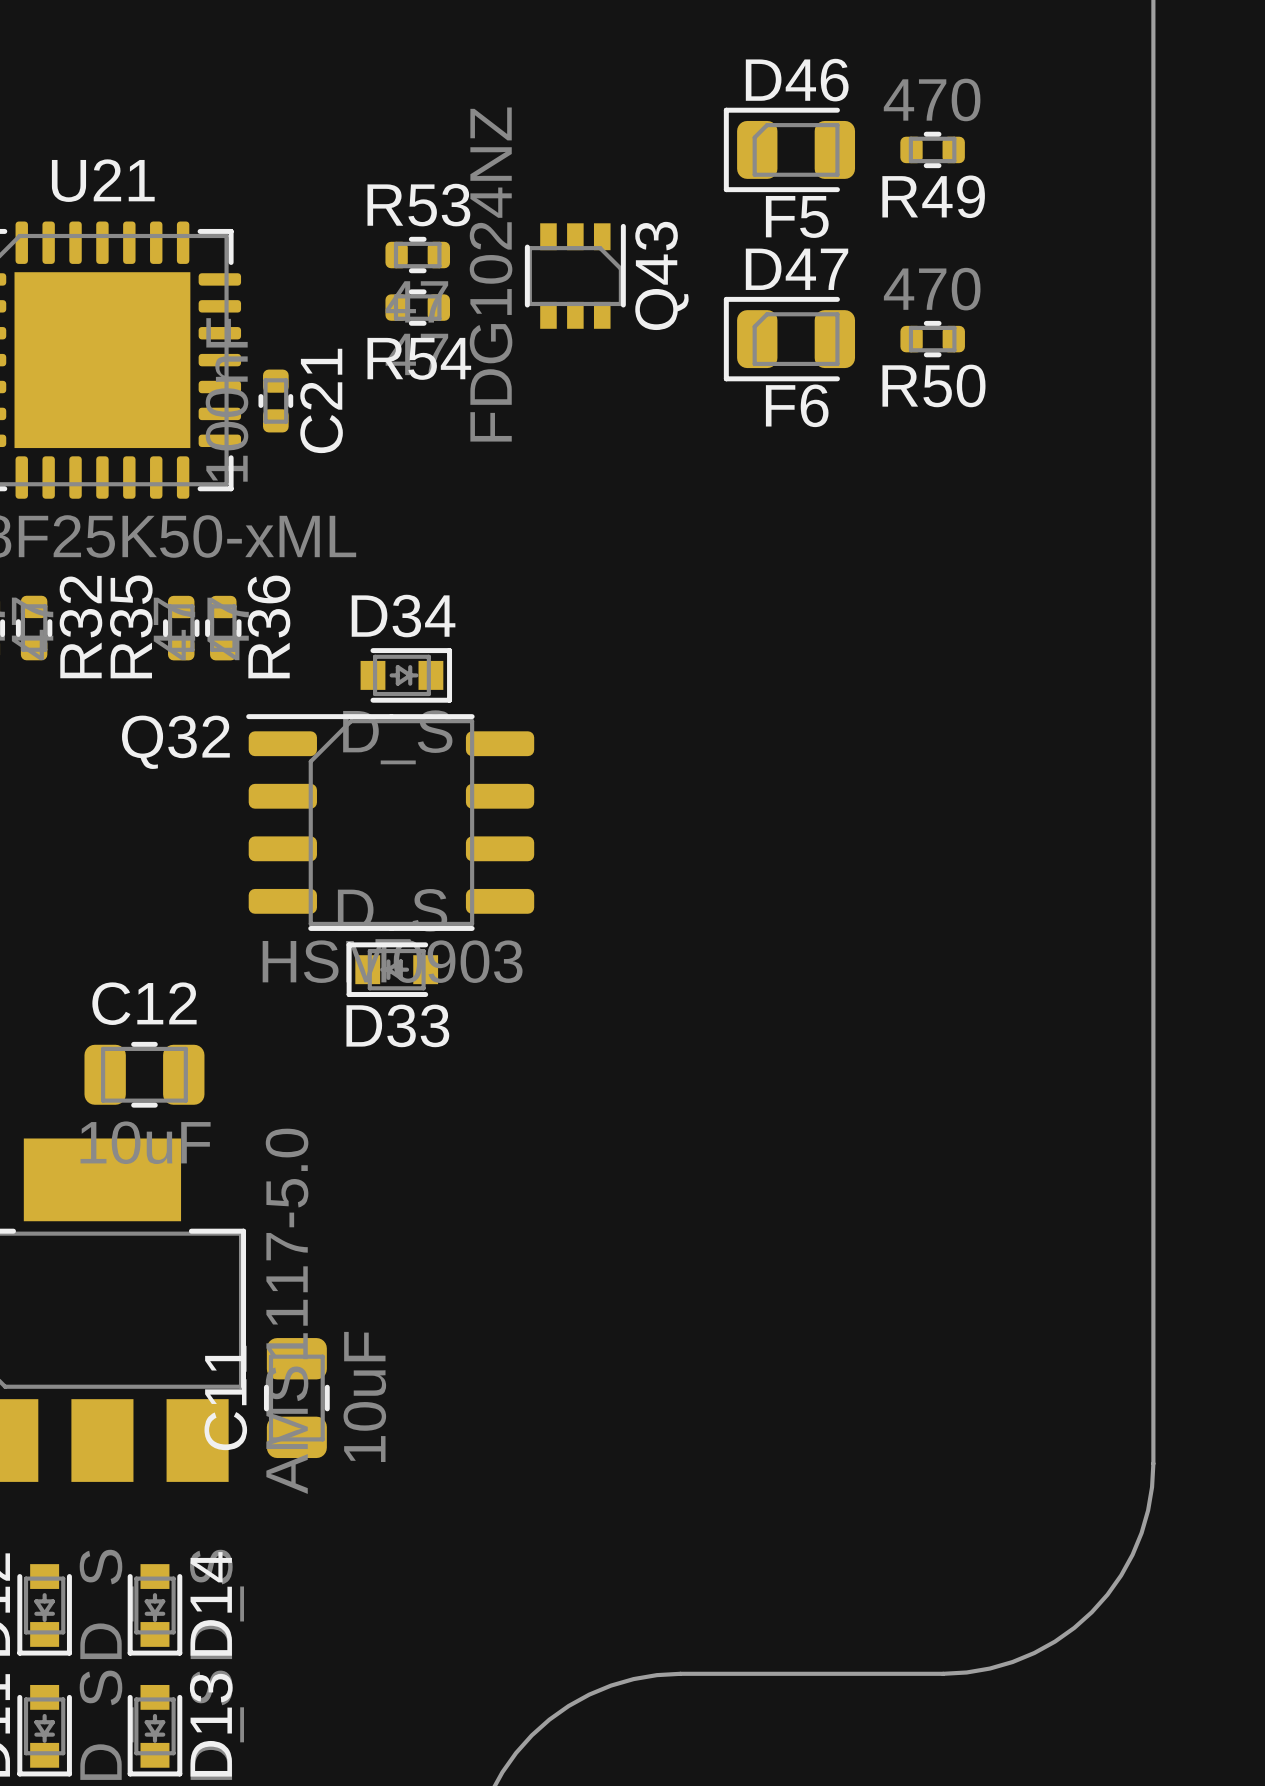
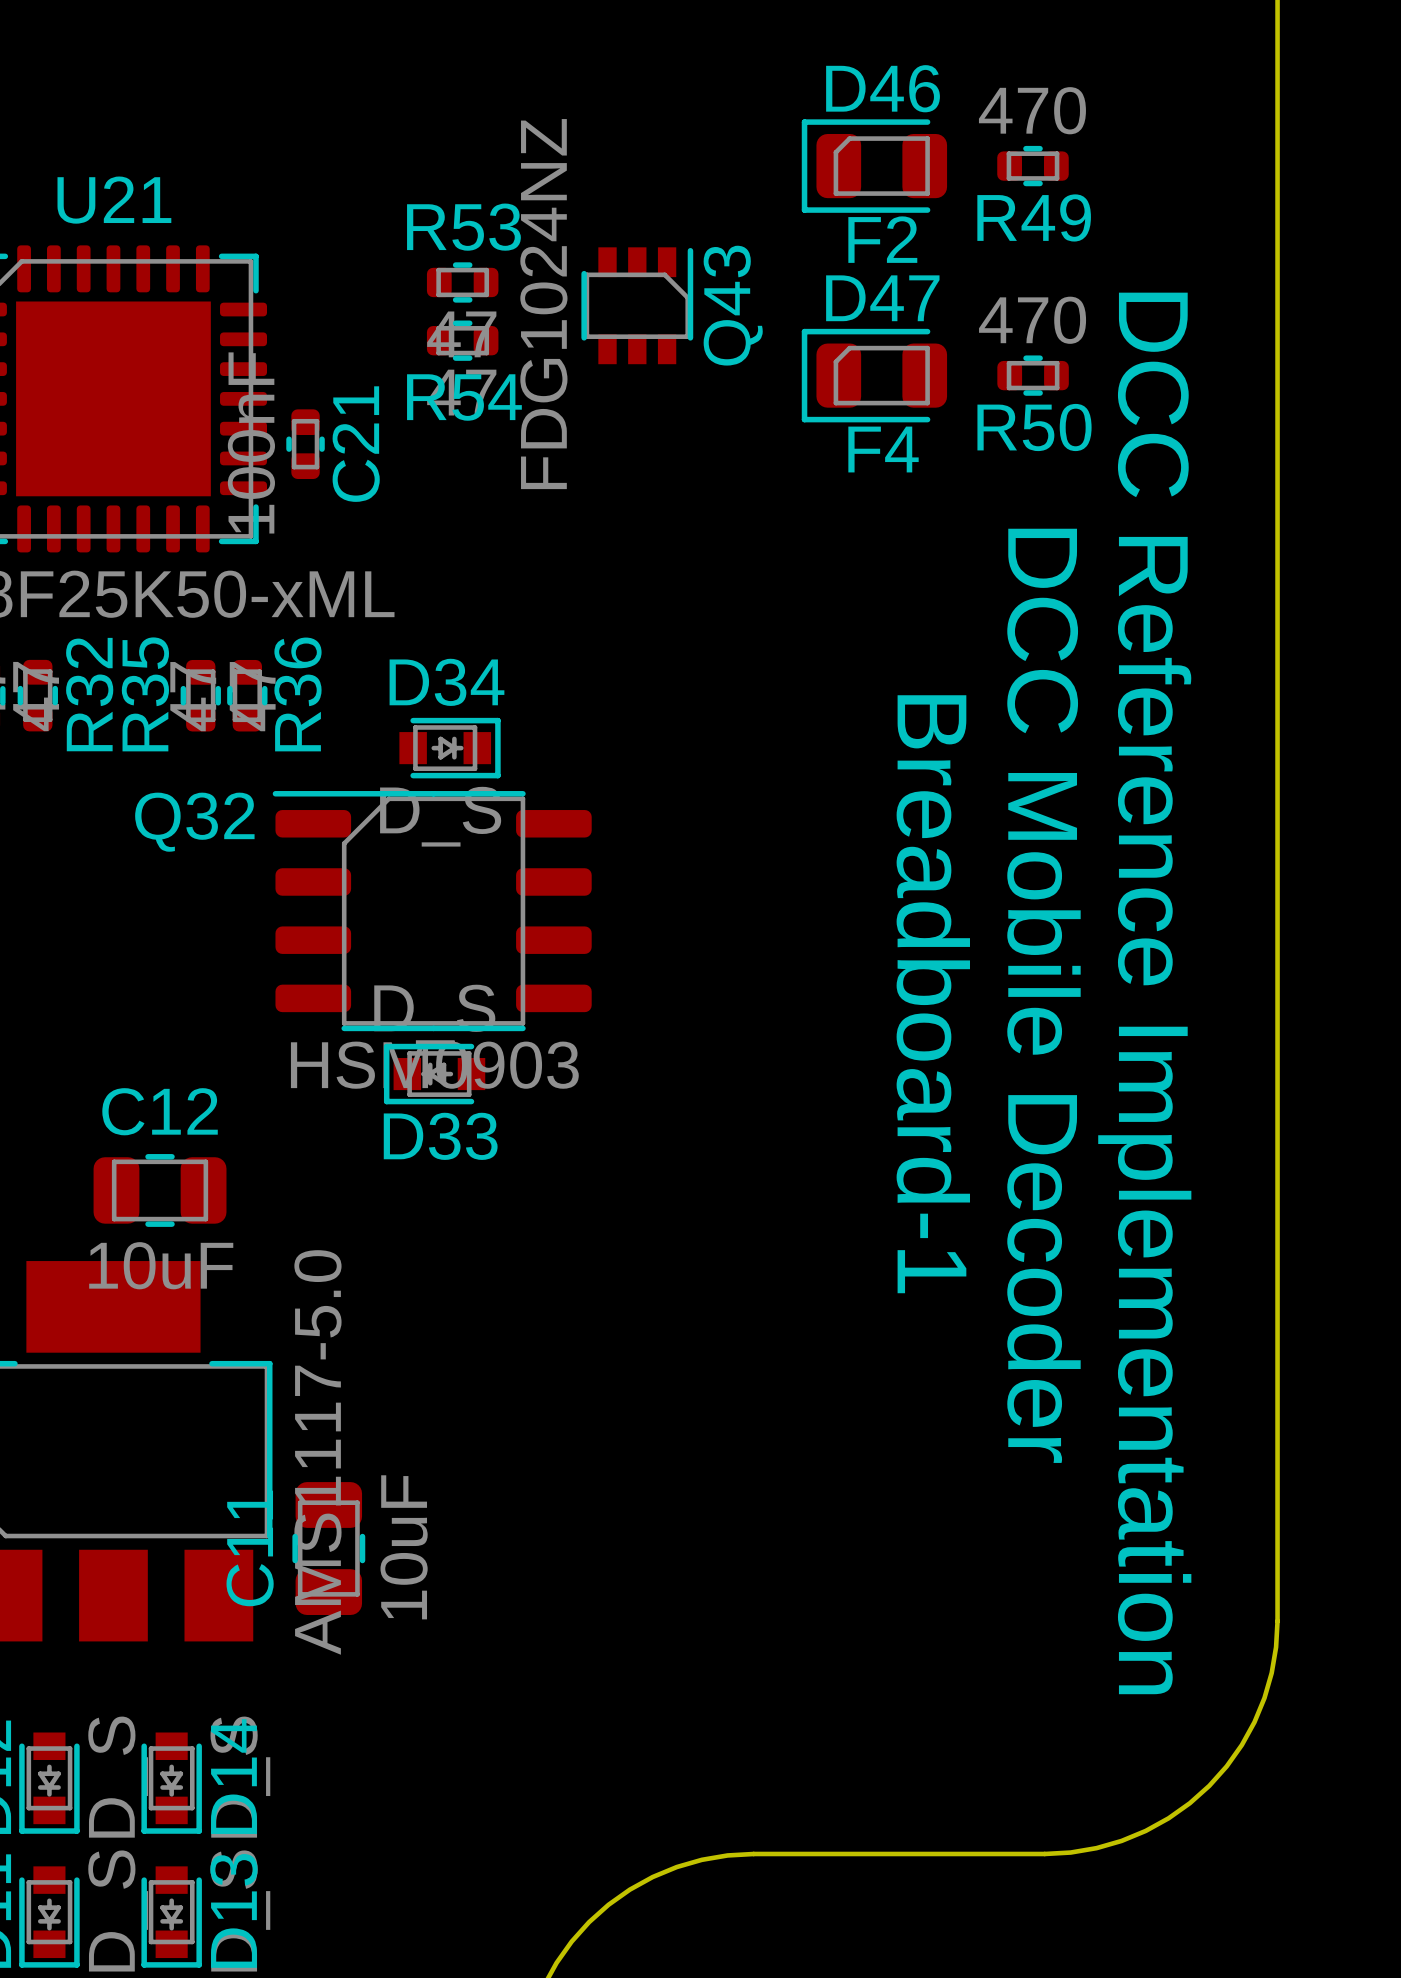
D46 value: F5 (797, 216) -> F2 (882, 239)
D47 value: F6 (797, 405) -> F4 (883, 449)
text: none -> DCC Reference Implementation (1144, 993)
text: none -> Breadboard-1 (933, 994)
text: none -> DCC Mobile Decoder (1043, 995)

